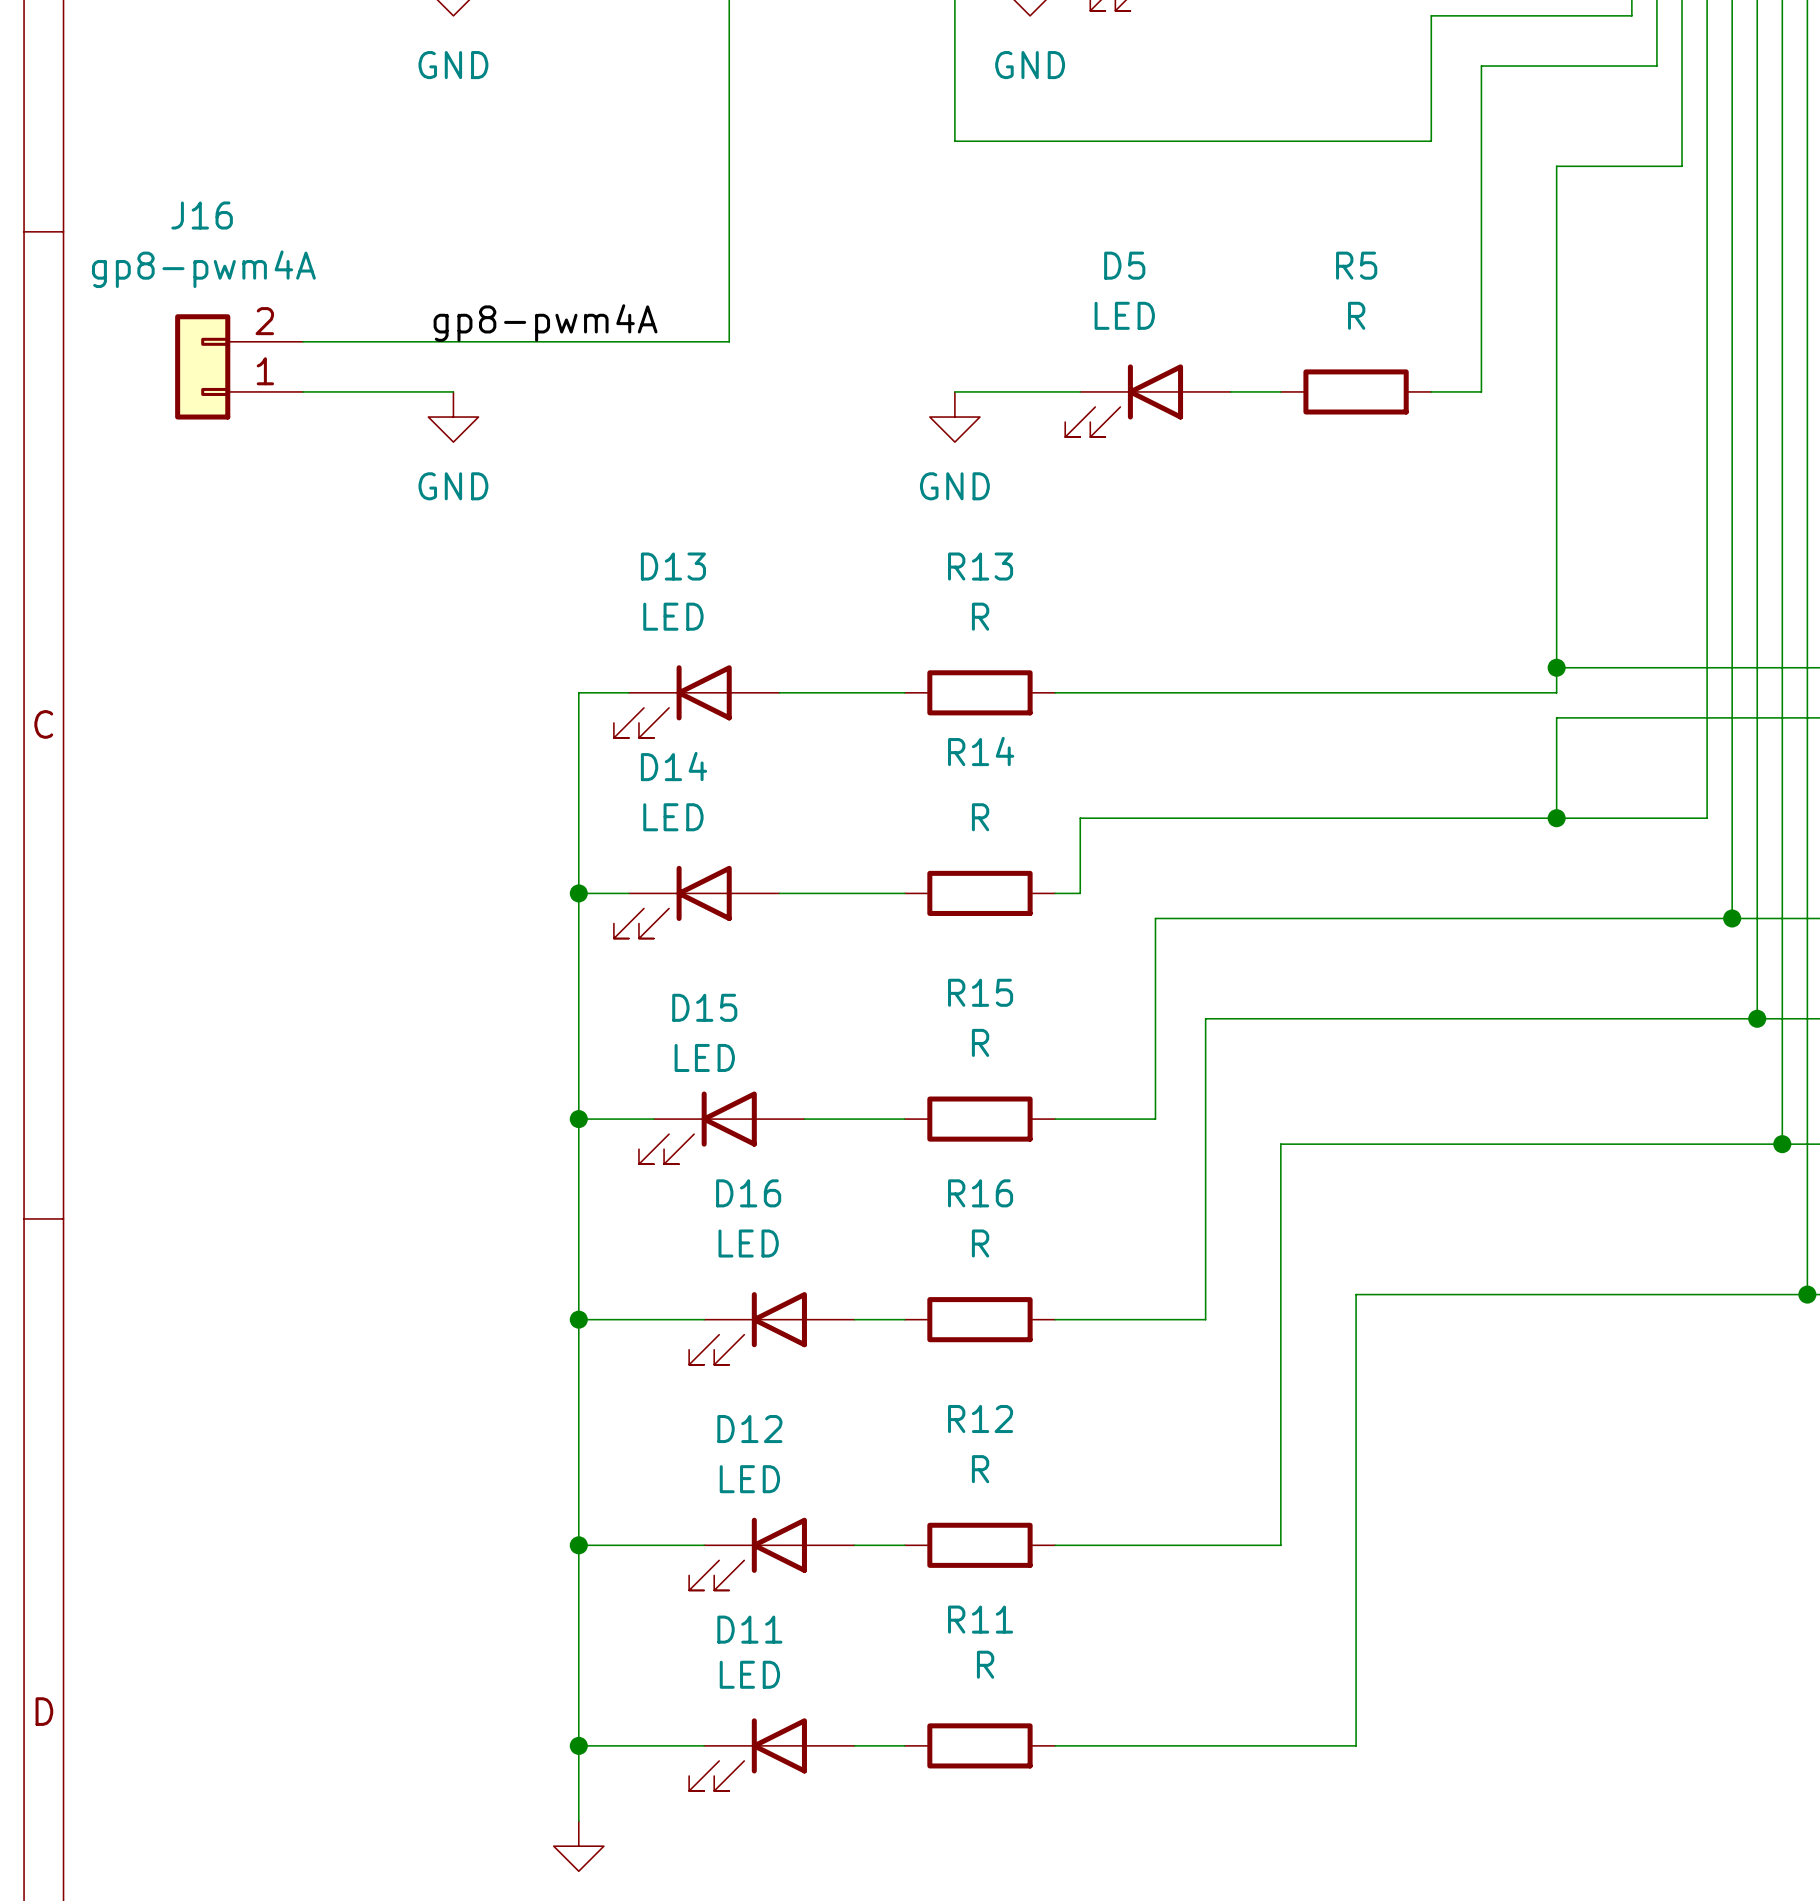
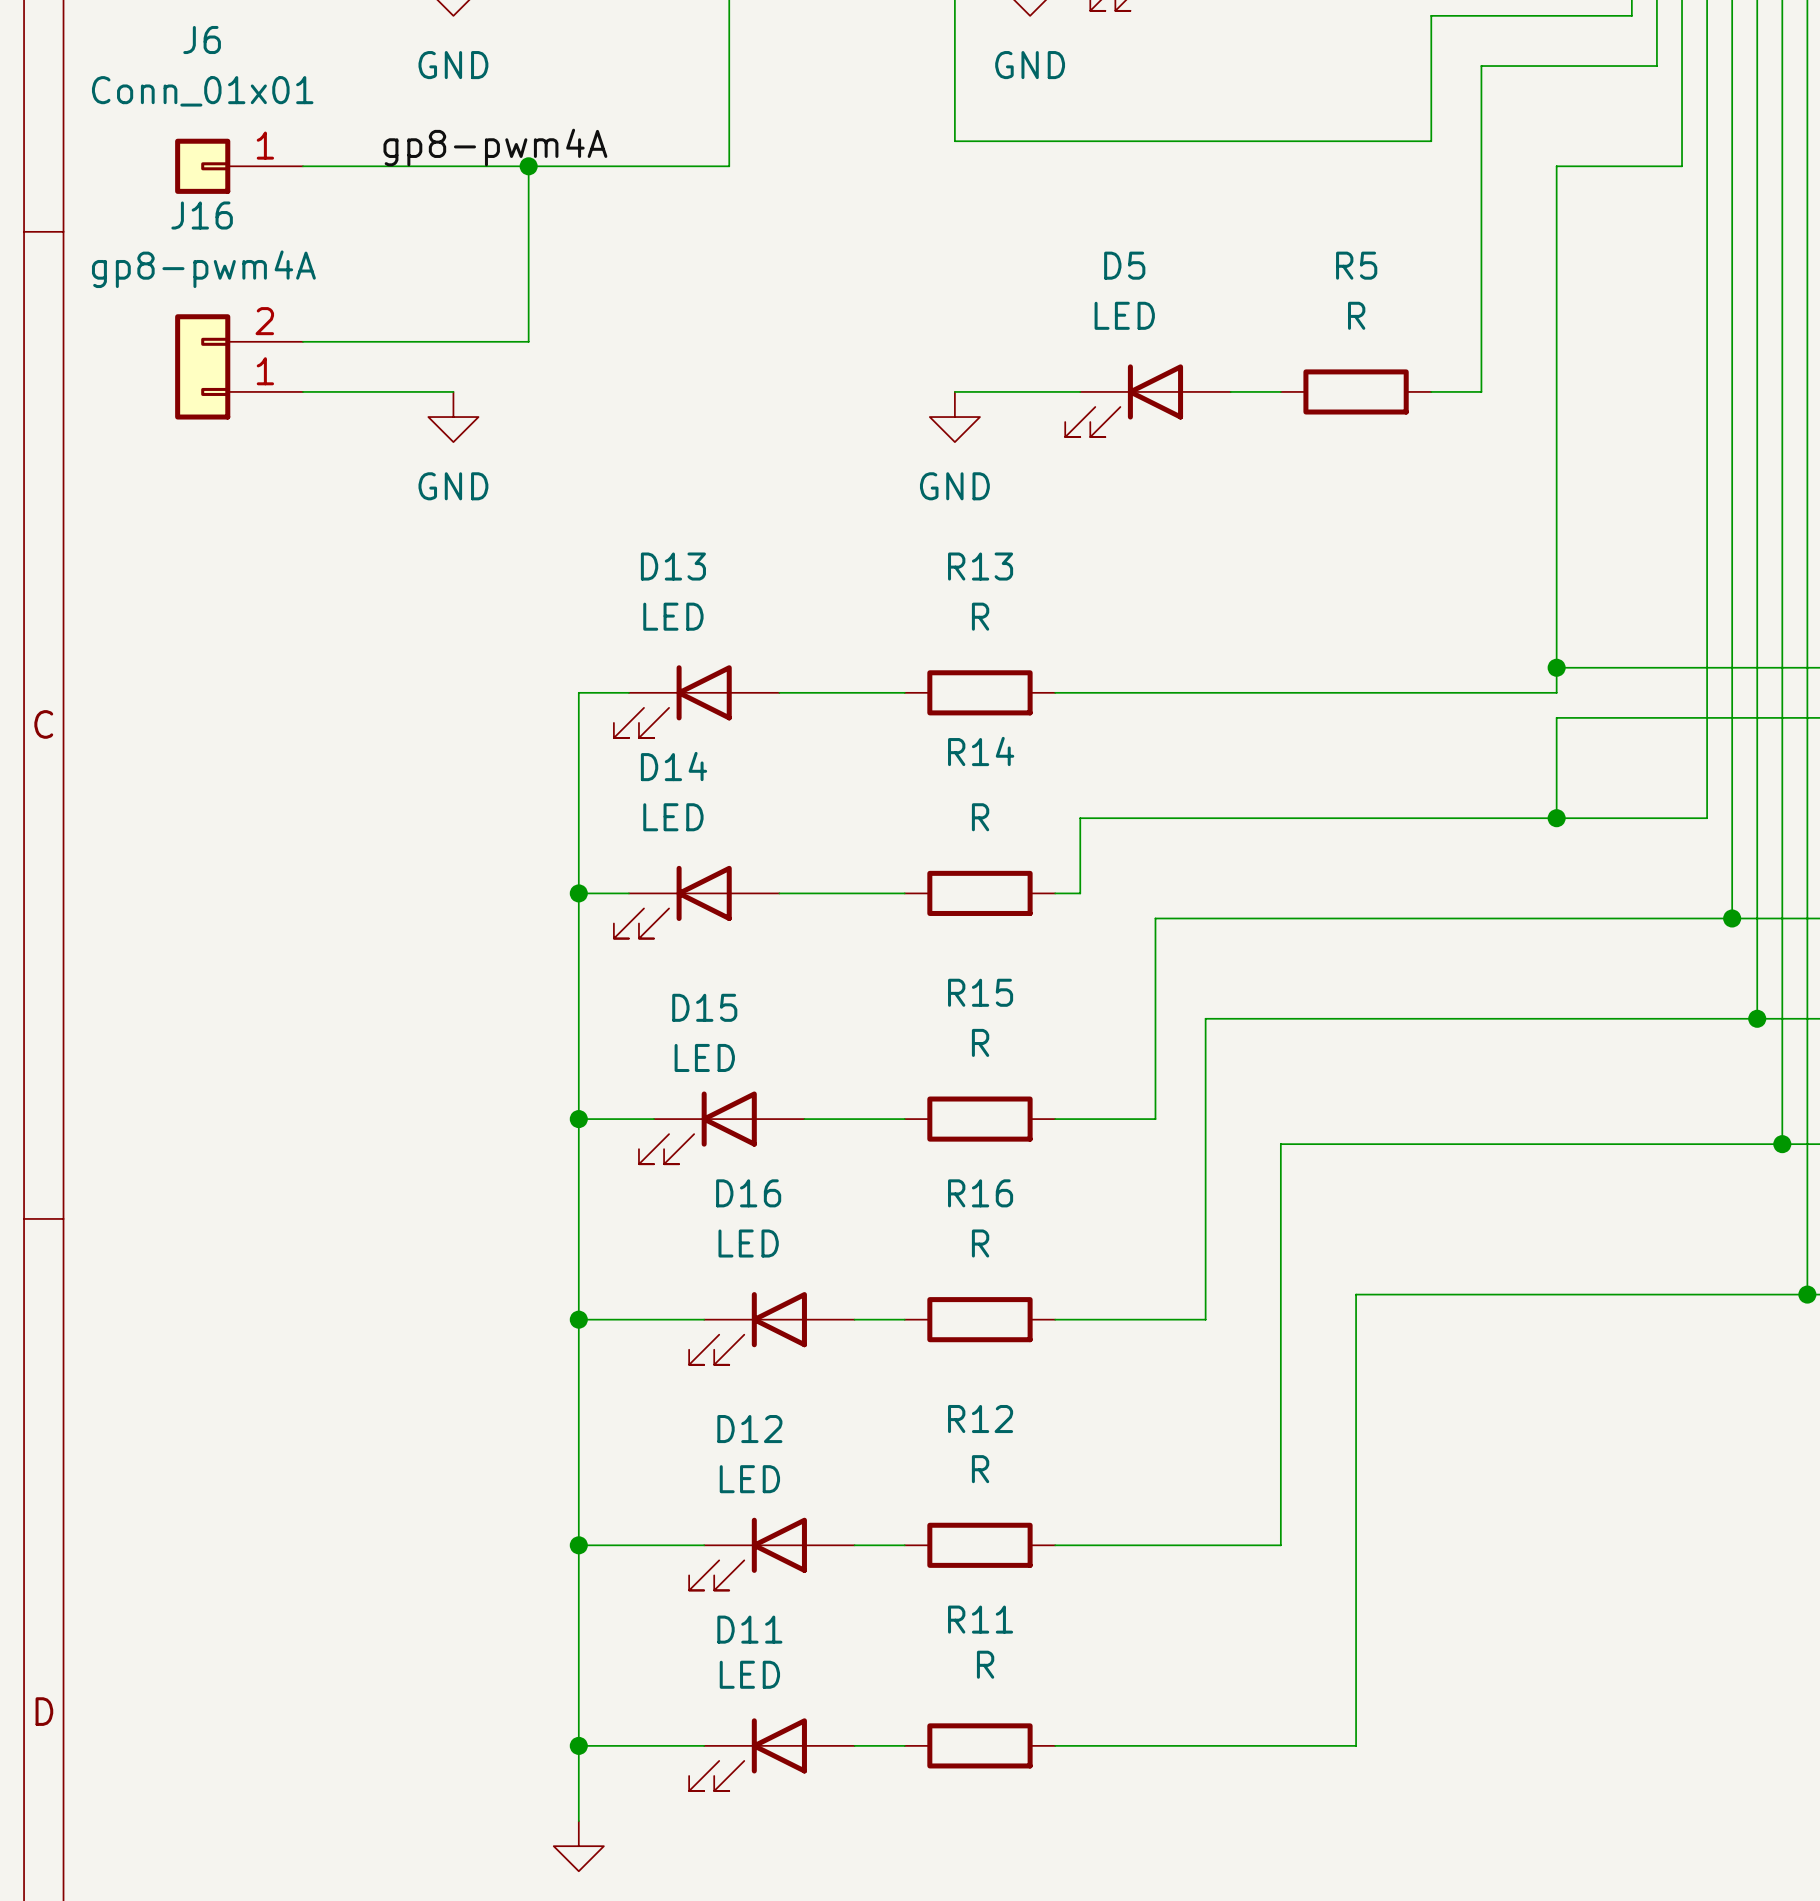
J6: none -> Conn_01x01 (239, 166)
wire: none -> (303, 166) (729, 166)
junction: none -> (528, 166)
wire: (729, 166) (729, 341) (528, 341) -> (528, 166) (528, 341)
label position: gp8-pwm4A (545, 323) -> gp8-pwm4A (495, 147)

